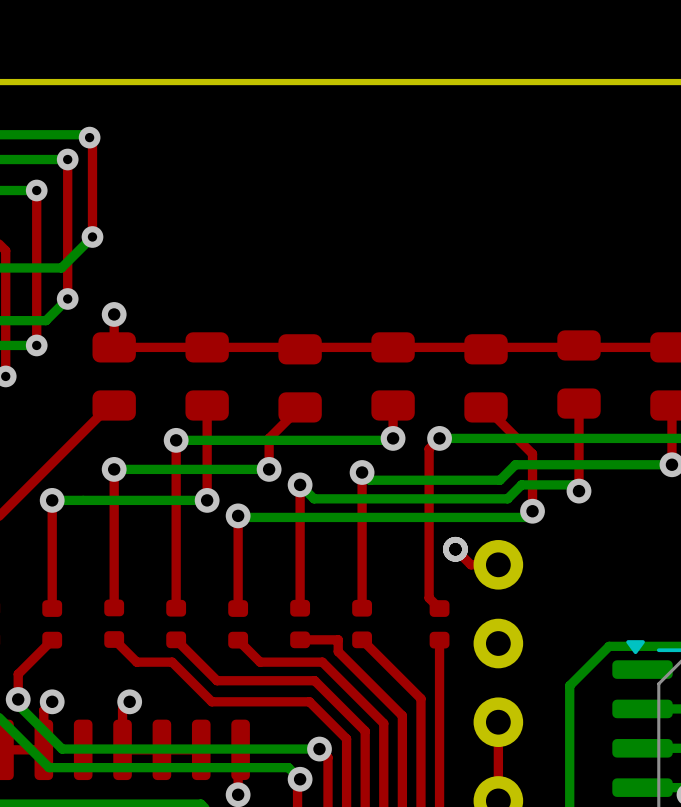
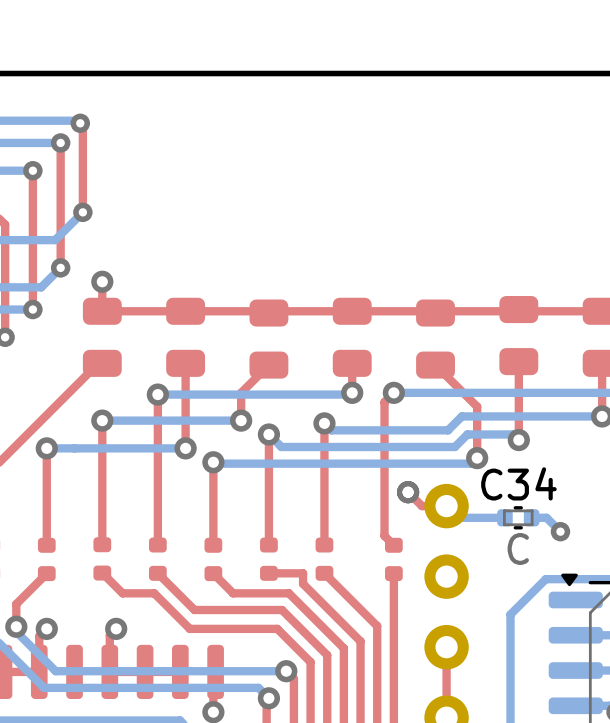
bottom track: none -> (446, 506) (458, 517) (504, 517)
C34: none -> C (518, 517)
bottom track: none -> (531, 517) (546, 517) (560, 531)
via: none -> (560, 531)

